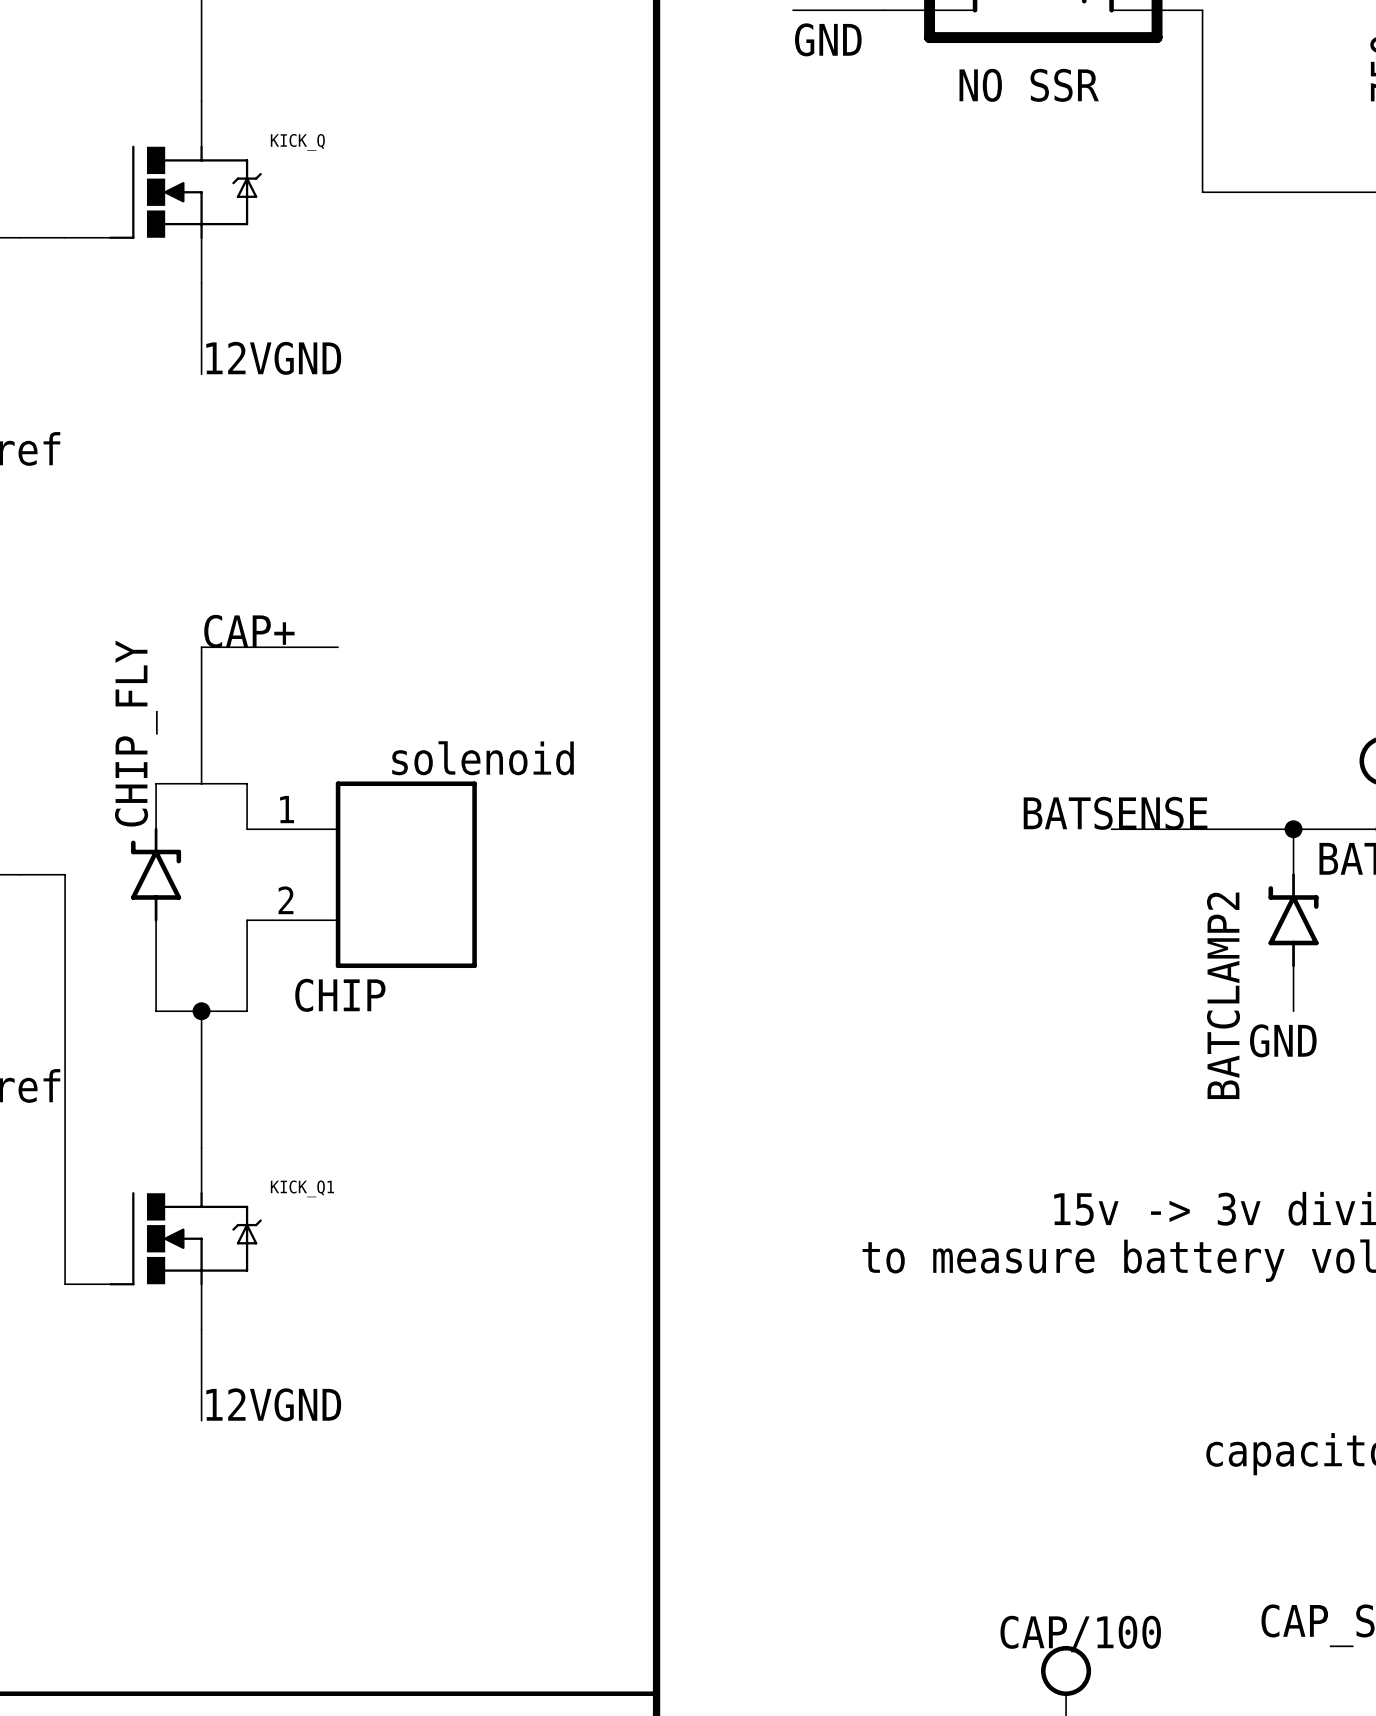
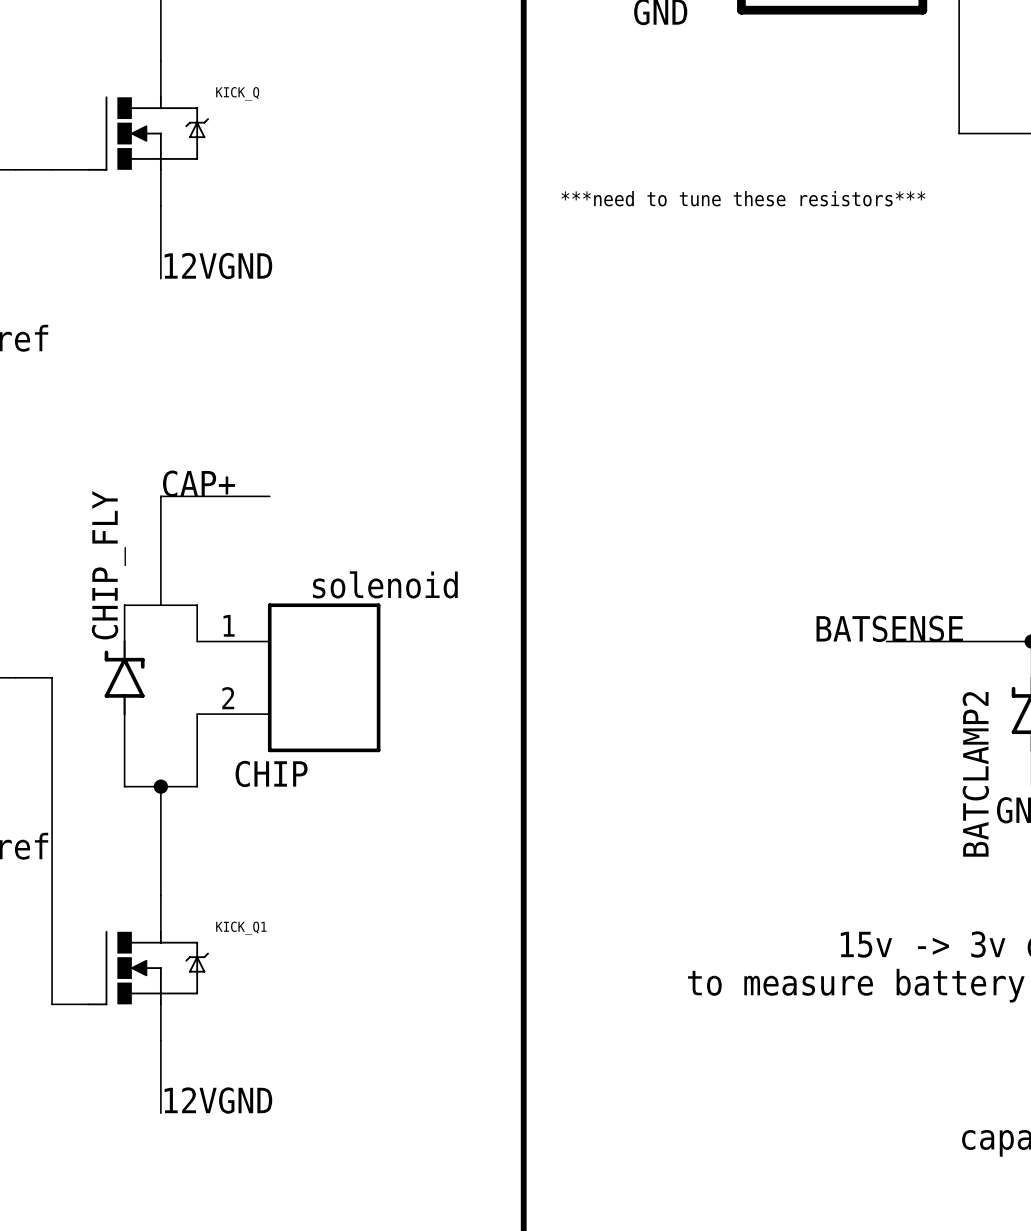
text: NO SSR (1029, 85) -> none
text: none -> ***need to tune these resistors*** (743, 198)

